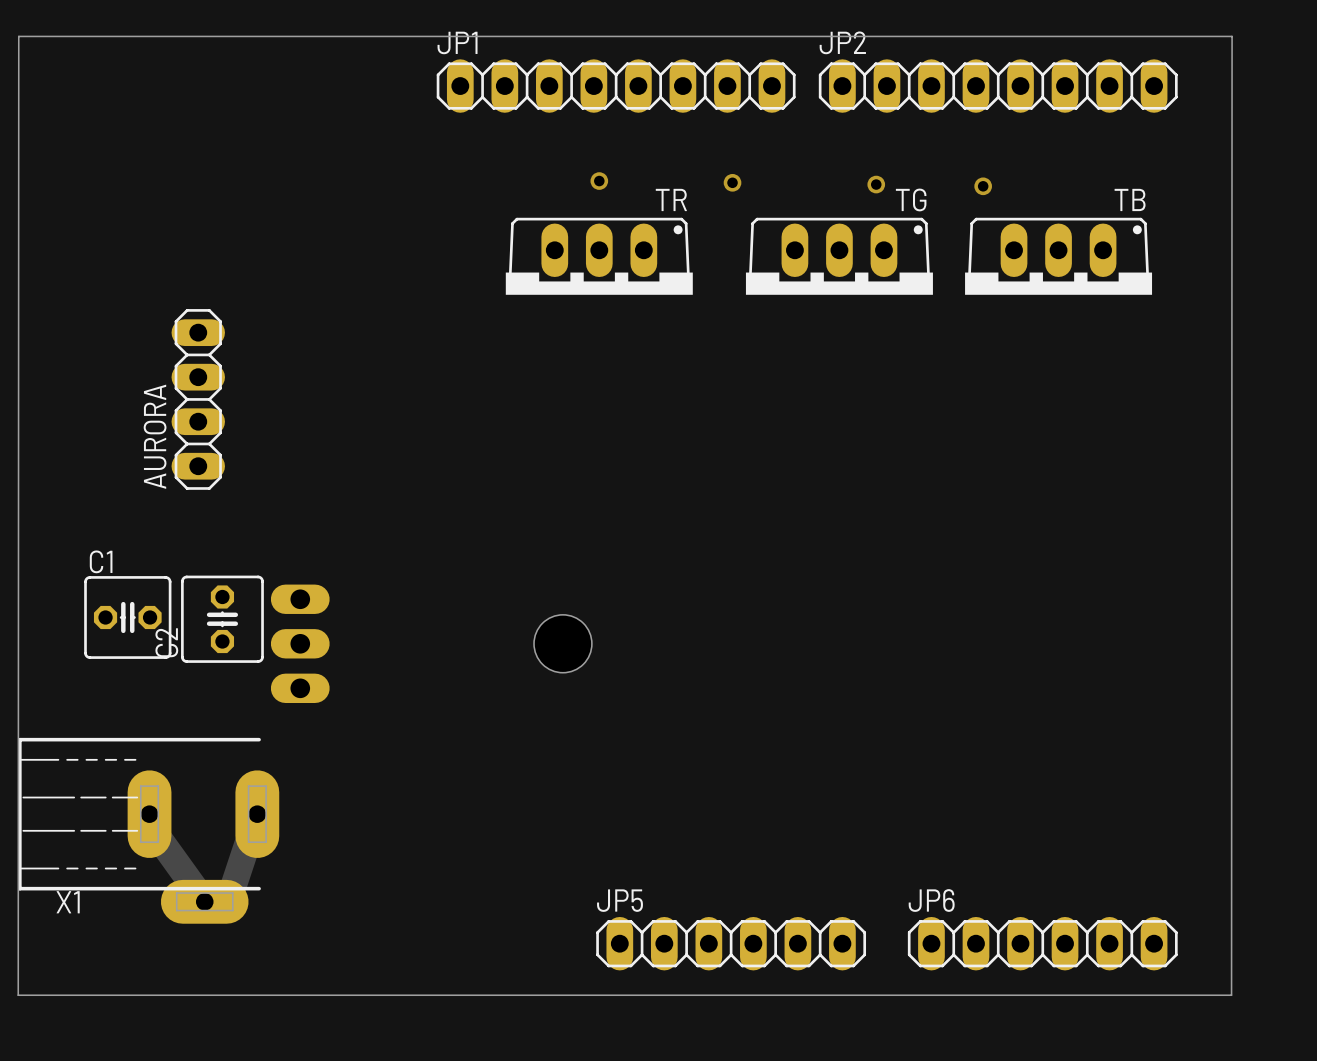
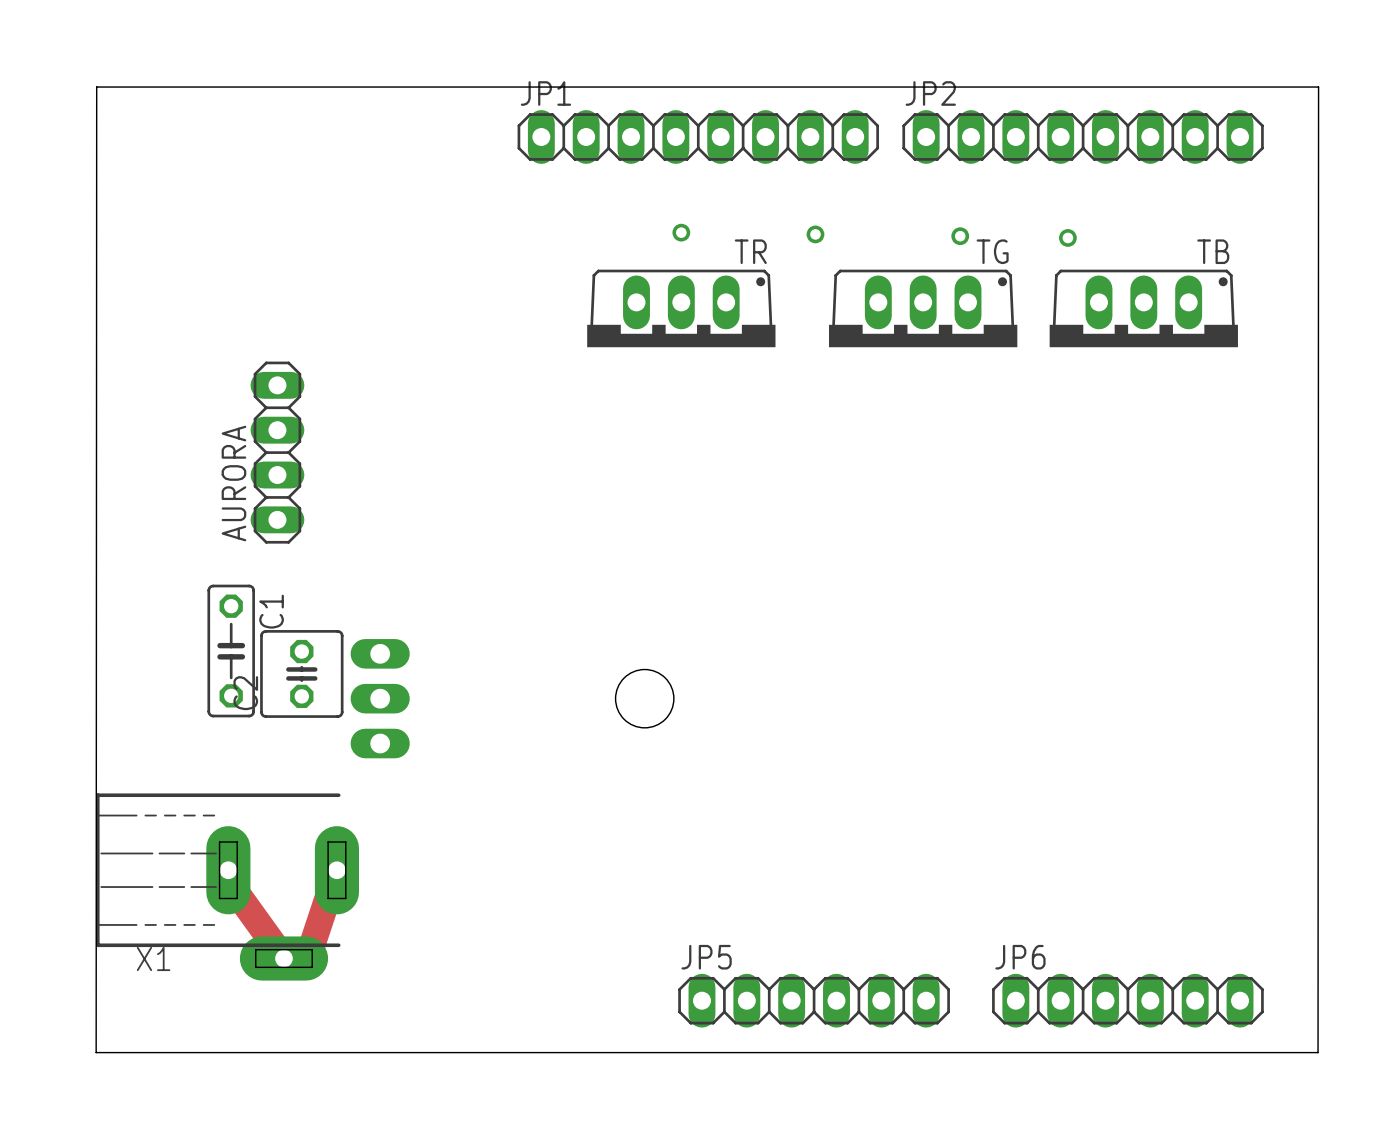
C1 name position: C1 (101, 561) -> C1 (271, 611)
C1 footprint: [84, 576, 172, 659] -> [207, 584, 255, 718]

